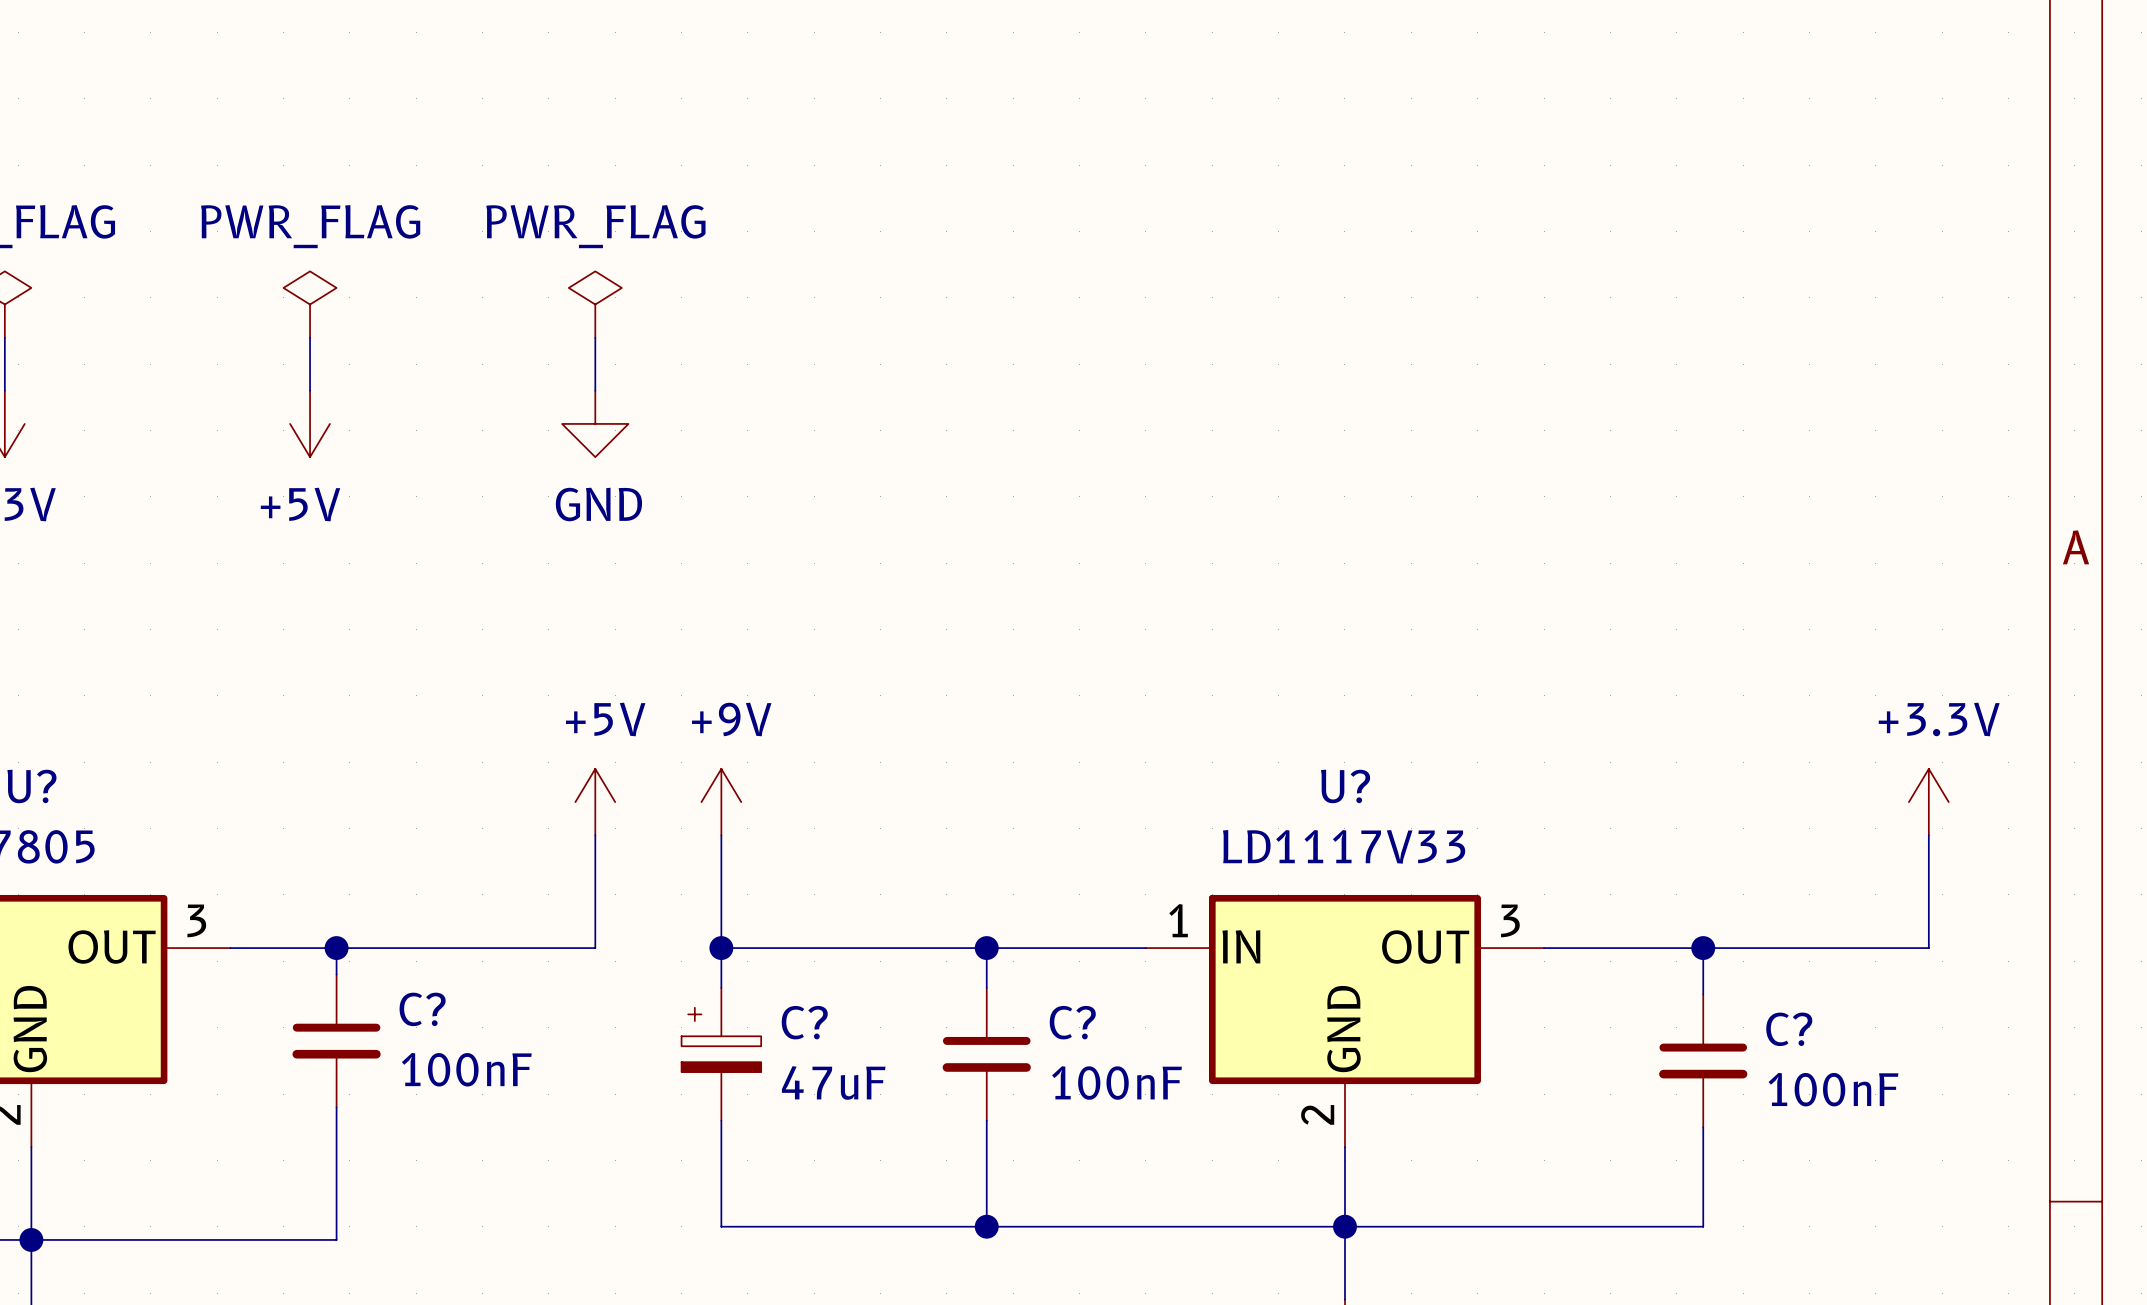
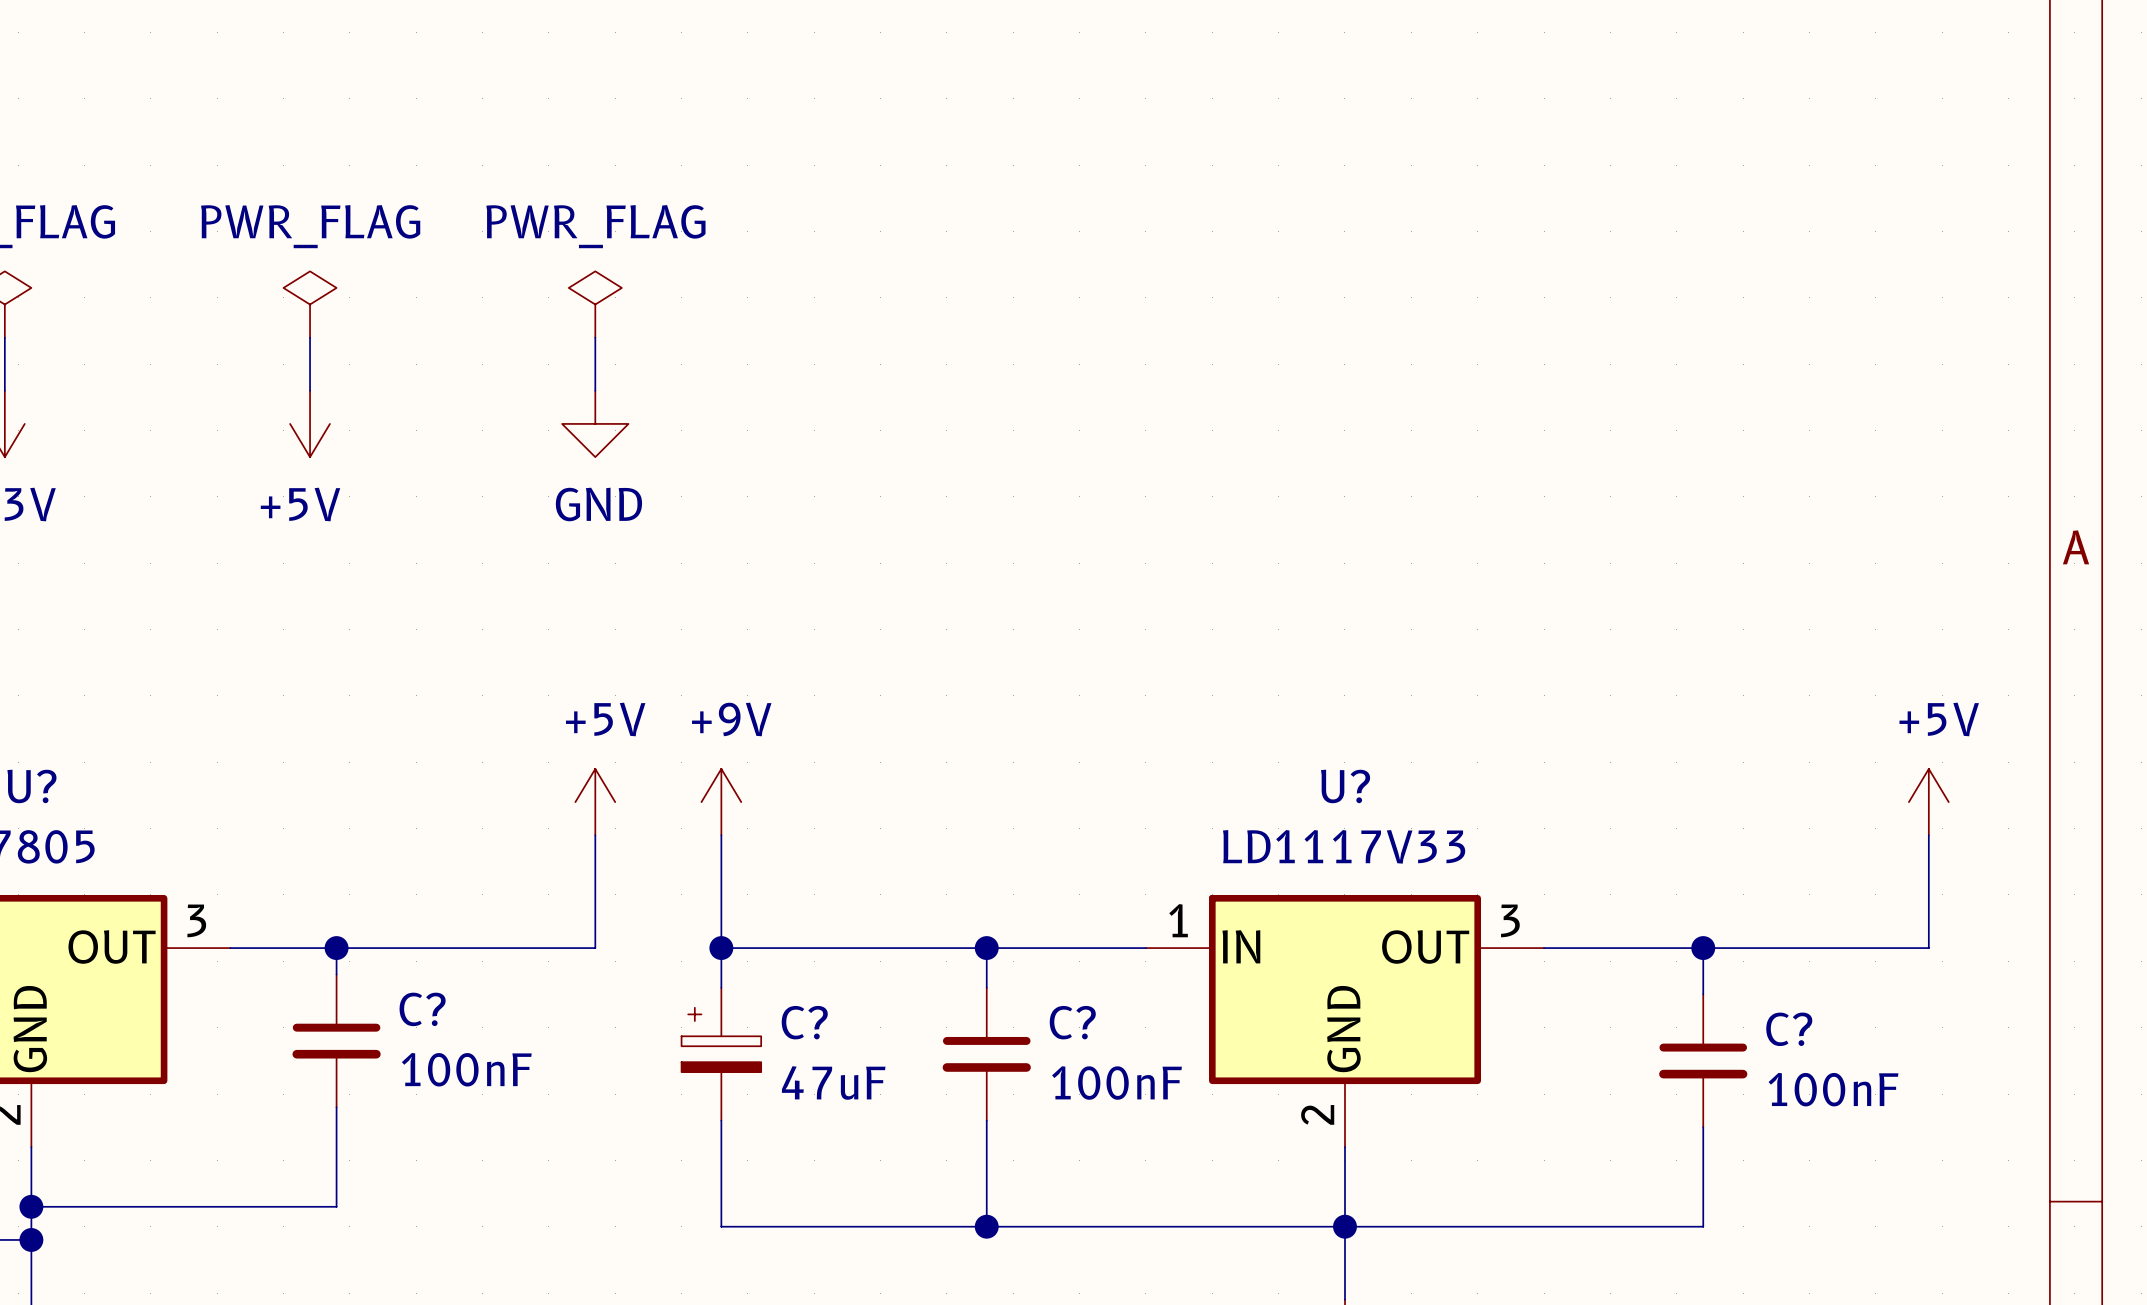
power symbol: +3.3V (1928, 802) -> +5V (1928, 802)
junction: none -> (31, 1206)
wire: (336, 1206) (336, 1239) (31, 1239) -> (336, 1206) (31, 1206)

